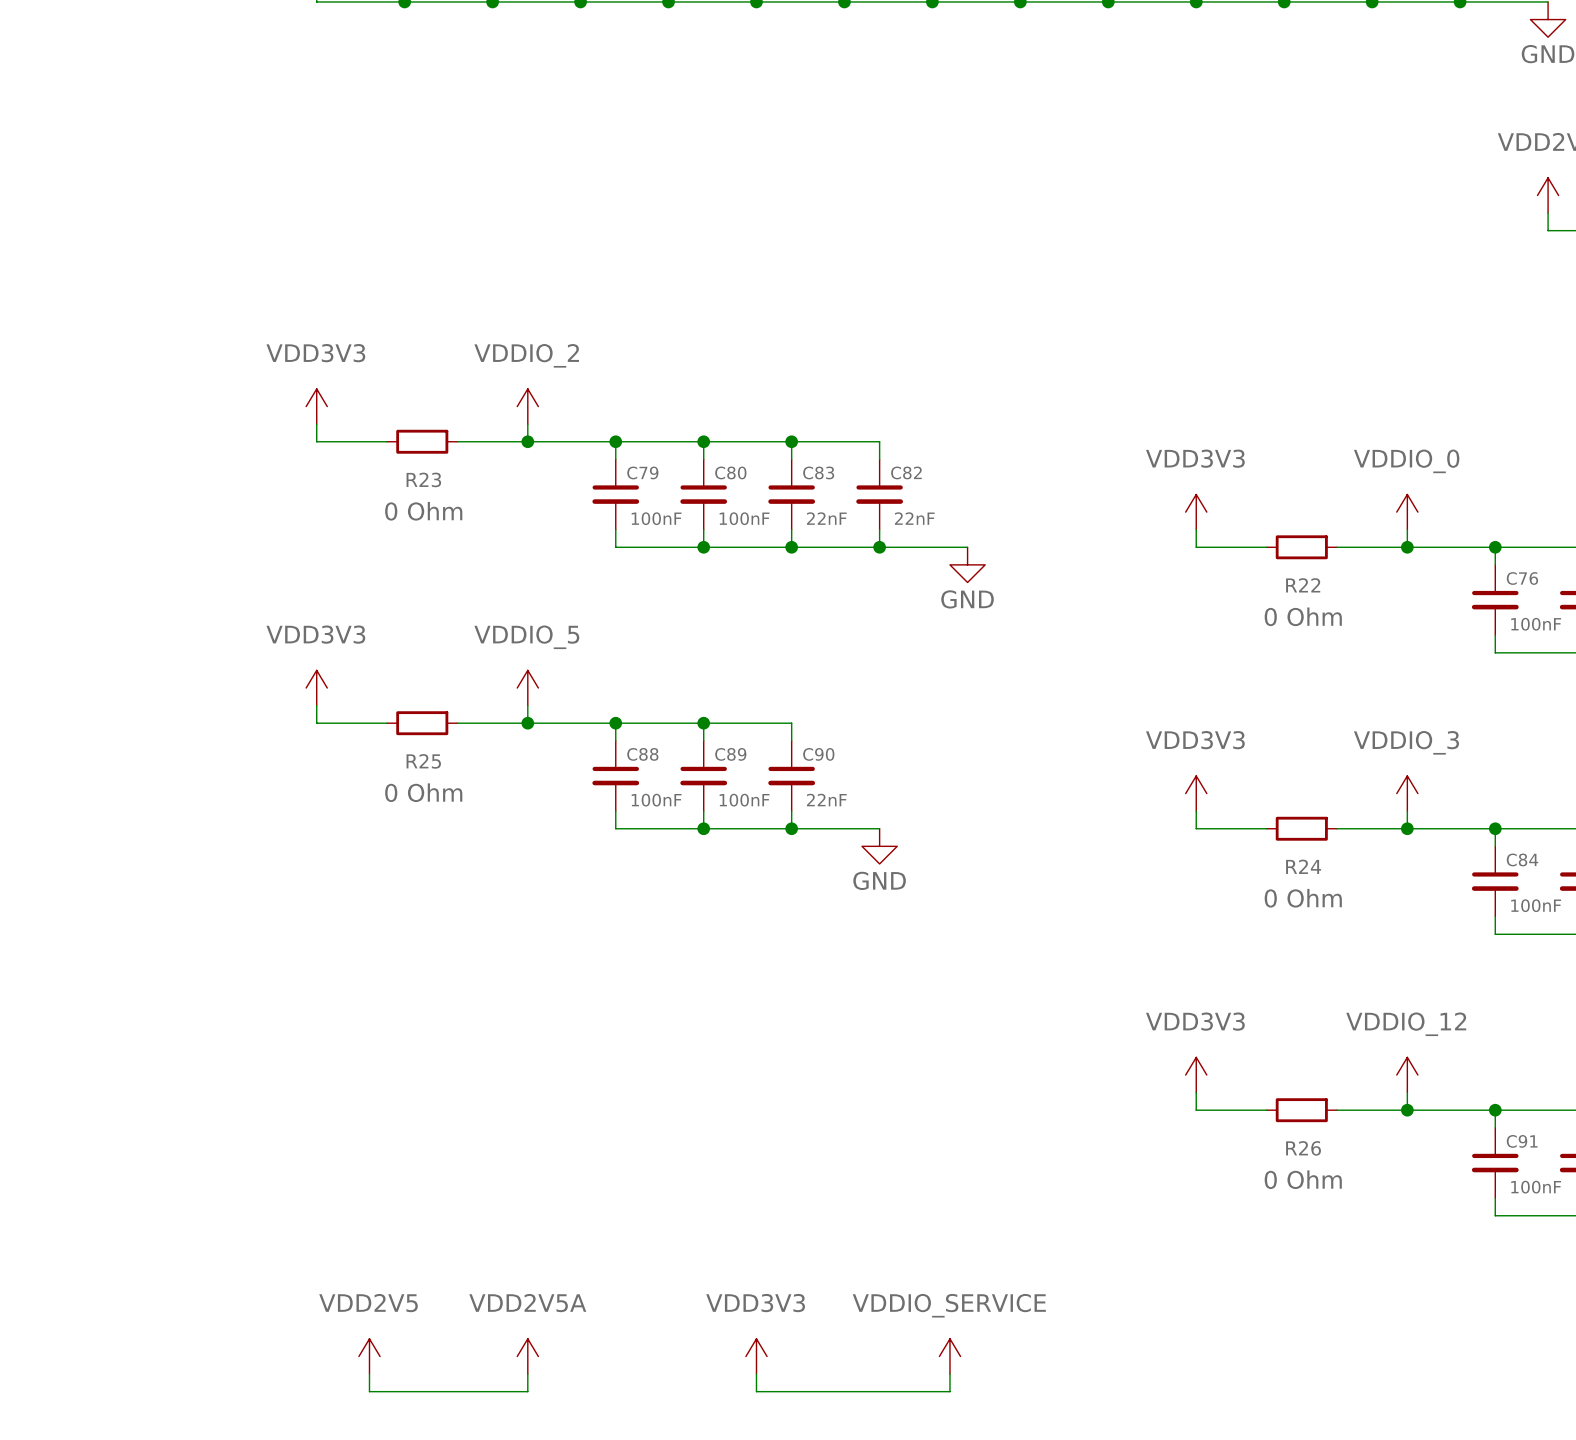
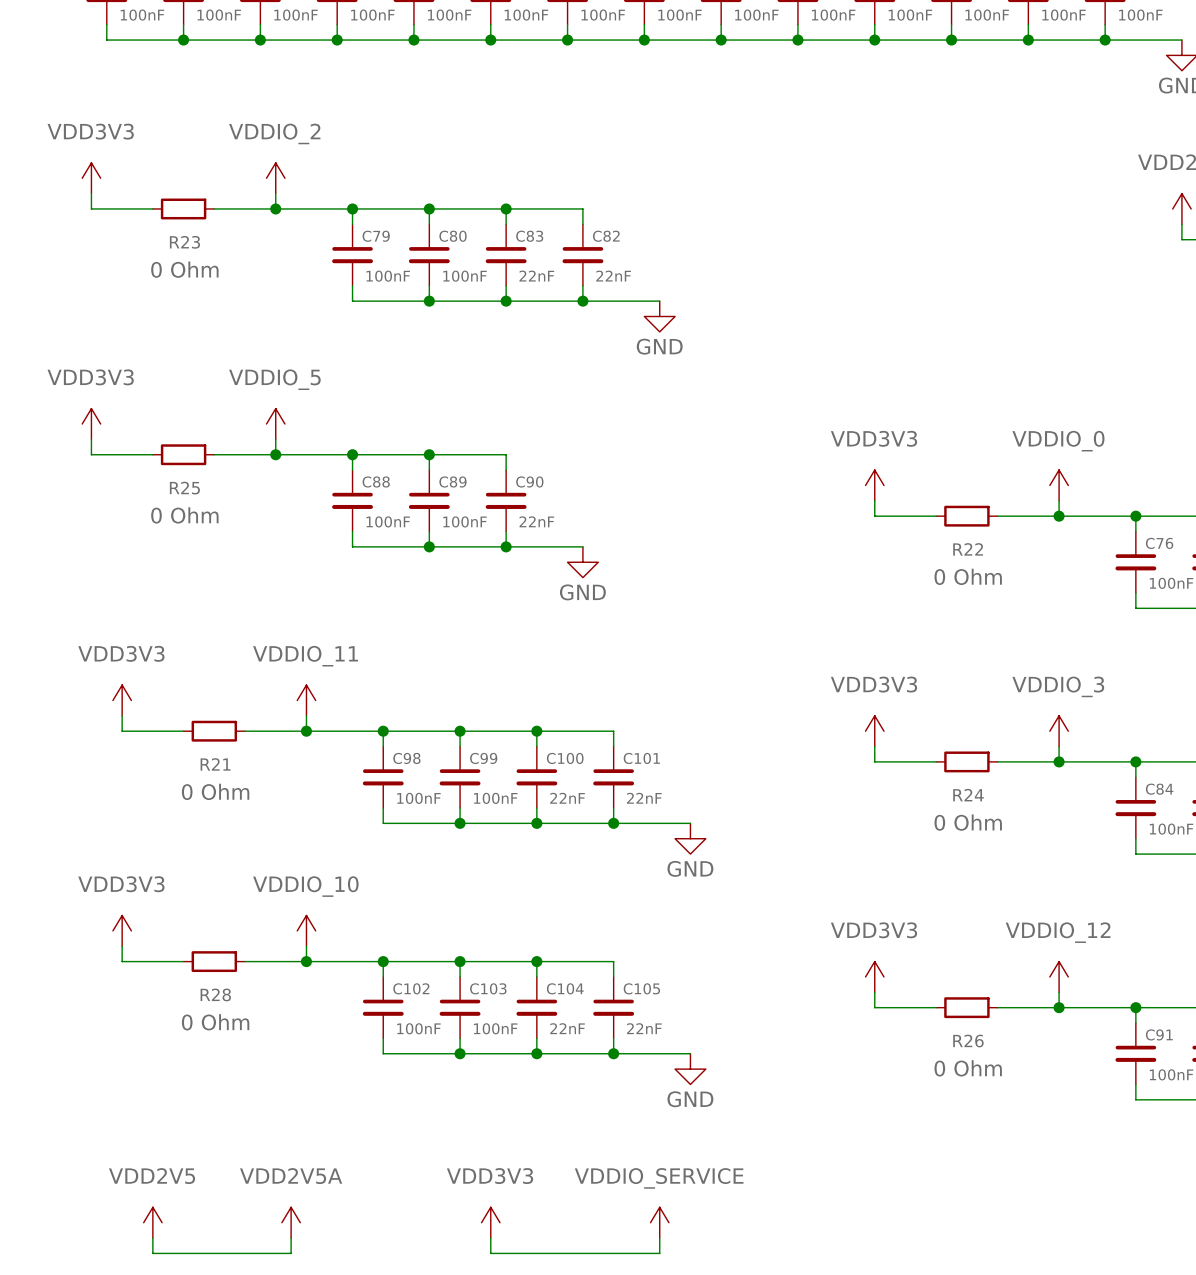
power symbol: none -> VDD3V3 (91, 178)
junction: none -> (275, 208)
junction: none -> (352, 208)
junction: none -> (429, 208)
junction: none -> (506, 208)
junction: none -> (429, 301)
junction: none -> (506, 301)
junction: none -> (582, 301)
power symbol: none -> GND (659, 316)
power symbol position: VDD3V3 (316, 406) -> VDD3V3 (91, 424)
power symbol position: VDDIO_2 (527, 406) -> VDDIO_2 (275, 178)
wire: (316, 424) (316, 441) (387, 441) -> (91, 193) (91, 208) (152, 208)
wire: (527, 424) (527, 441) -> (275, 193) (275, 208)
R23 position: (422, 441) -> (183, 208)
wire: (457, 441) (879, 441) (879, 459) -> (214, 208) (582, 208) (582, 224)
junction: (527, 441) -> none
wire: (615, 441) (615, 459) -> (352, 208) (352, 224)
junction: (615, 441) -> none
wire: (703, 441) (703, 459) -> (429, 208) (429, 224)
junction: (703, 441) -> none
wire: (791, 441) (791, 459) -> (506, 208) (506, 224)
junction: (791, 441) -> none
junction: none -> (275, 454)
junction: none -> (352, 454)
junction: none -> (429, 454)
C79 position: (615, 494) -> (352, 255)
C80 position: (703, 494) -> (429, 255)
C83 position: (791, 494) -> (506, 255)
C82 position: (879, 494) -> (582, 255)
wire: (615, 529) (615, 547) (967, 547) -> (352, 285) (352, 301) (659, 301)
wire: (703, 529) (703, 547) -> (429, 285) (429, 301)
wire: (791, 529) (791, 547) -> (506, 285) (506, 301)
wire: (879, 529) (879, 547) -> (582, 285) (582, 301)
junction: (703, 547) -> none
junction: (791, 547) -> none
junction: (879, 547) -> none
power symbol position: GND (967, 564) -> GND (582, 562)
junction: none -> (429, 546)
junction: none -> (506, 546)
power symbol position: VDD3V3 (316, 688) -> VDD3V3 (122, 700)
power symbol position: VDDIO_5 (527, 688) -> VDDIO_5 (275, 424)
wire: (316, 705) (316, 723) (387, 723) -> (91, 439) (91, 454) (152, 454)
wire: (527, 705) (527, 723) -> (275, 439) (275, 454)
R25 position: (422, 723) -> (183, 454)
wire: (457, 723) (791, 723) (791, 740) -> (214, 454) (506, 454) (506, 470)
junction: (527, 723) -> none
wire: (615, 723) (615, 740) -> (352, 454) (352, 470)
junction: (615, 723) -> none
wire: (703, 723) (703, 740) -> (429, 454) (429, 470)
junction: (703, 723) -> none
power symbol: none -> VDDIO_11 (306, 700)
wire: none -> (122, 715) (122, 731) (183, 731)
wire: none -> (306, 715) (306, 731)
C88 position: (615, 775) -> (352, 500)
C89 position: (703, 775) -> (429, 500)
C90 position: (791, 775) -> (506, 500)
R21: none -> 0 Ohm (214, 731)
wire: none -> (245, 731) (613, 731) (613, 746)
junction: none -> (306, 731)
wire: none -> (383, 731) (383, 746)
junction: none -> (383, 731)
wire: none -> (460, 731) (460, 746)
junction: none -> (460, 731)
wire: none -> (536, 731) (536, 746)
junction: none -> (536, 731)
wire: (615, 811) (615, 828) (879, 828) -> (352, 531) (352, 546) (582, 546)
wire: (703, 811) (703, 828) -> (429, 531) (429, 546)
wire: (791, 811) (791, 828) -> (506, 531) (506, 546)
junction: (703, 828) -> none
junction: (791, 828) -> none
C98: none -> 100nF (383, 777)
C99: none -> 100nF (460, 777)
C100: none -> 22nF (536, 777)
power symbol: GND (879, 846) -> none
C101: none -> 22nF (613, 777)
wire: none -> (383, 808) (383, 823) (690, 823)
wire: none -> (460, 808) (460, 823)
wire: none -> (536, 808) (536, 823)
wire: none -> (613, 808) (613, 823)
junction: none -> (460, 823)
junction: none -> (536, 823)
junction: none -> (613, 823)
power symbol: none -> GND (690, 838)
power symbol: none -> VDD3V3 (122, 930)
power symbol: none -> VDDIO_10 (306, 930)
wire: none -> (122, 946) (122, 961) (183, 961)
wire: none -> (306, 946) (306, 961)
R28: none -> 0 Ohm (214, 961)
wire: none -> (245, 961) (613, 961) (613, 976)
junction: none -> (306, 961)
wire: none -> (383, 961) (383, 976)
junction: none -> (383, 961)
wire: none -> (460, 961) (460, 976)
junction: none -> (460, 961)
wire: none -> (536, 961) (536, 976)
junction: none -> (536, 961)
C102: none -> 100nF (383, 1007)
C103: none -> 100nF (460, 1007)
C104: none -> 22nF (536, 1007)
C105: none -> 22nF (613, 1007)
wire: none -> (383, 1038) (383, 1053) (690, 1053)
wire: none -> (460, 1038) (460, 1053)
wire: none -> (536, 1038) (536, 1053)
wire: none -> (613, 1038) (613, 1053)
junction: none -> (460, 1053)
junction: none -> (536, 1053)
junction: none -> (613, 1053)
power symbol: none -> GND (690, 1069)

